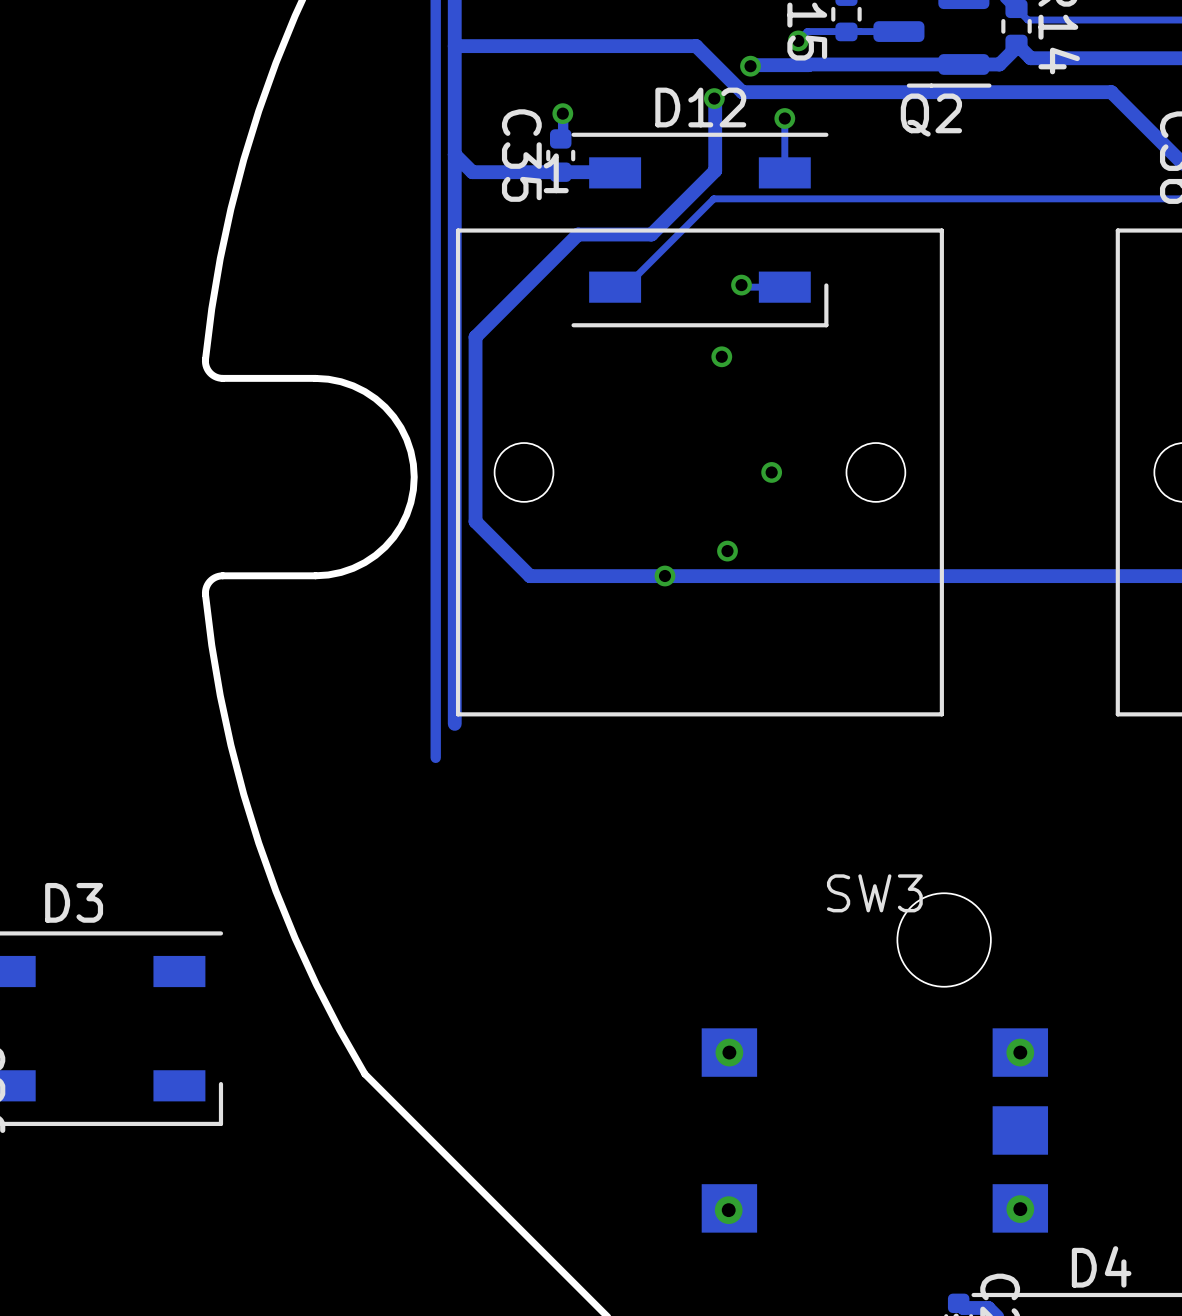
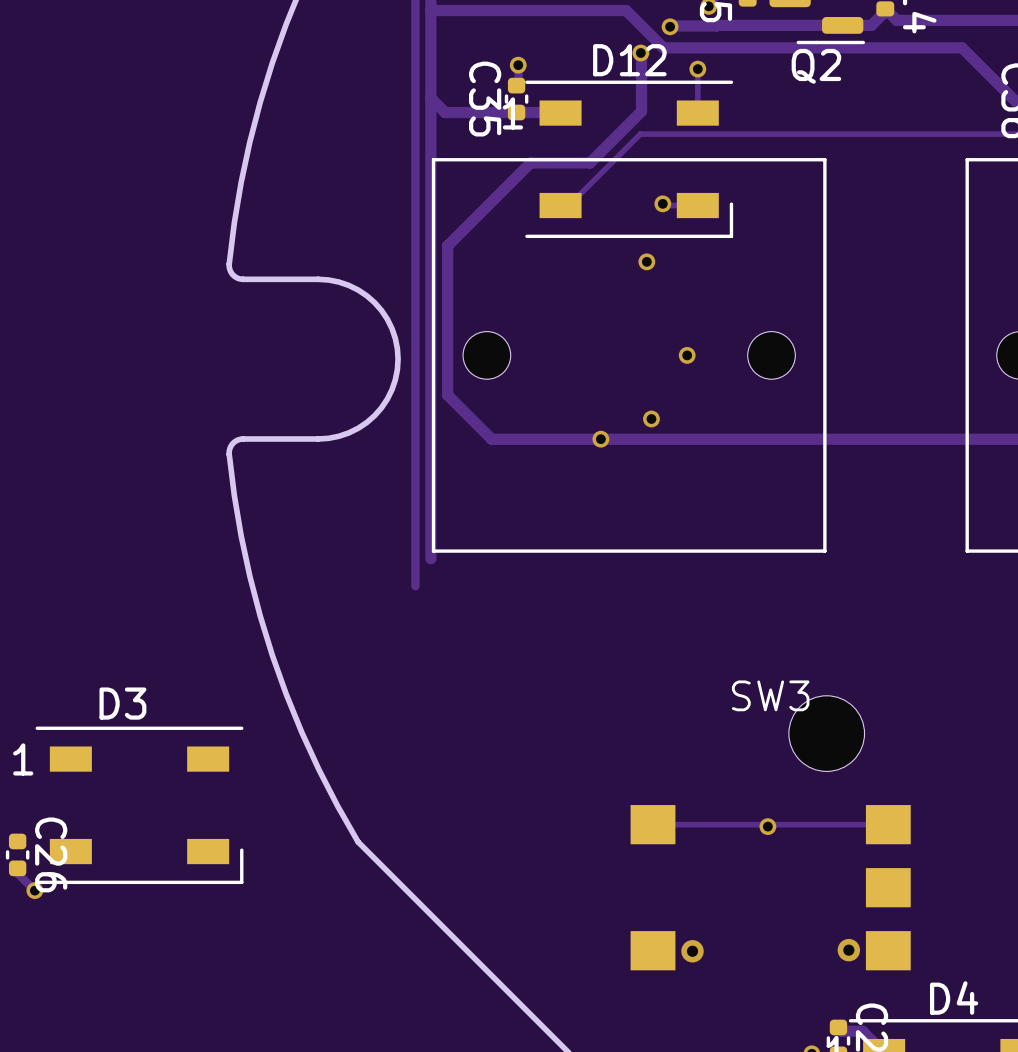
via: (729, 1052) -> none
track: none -> (888, 824) (769, 824) (767, 826) (765, 824) (653, 824)
via: (1020, 1052) -> none
via: none -> (767, 826)
via position: (1020, 1209) -> (848, 950)
via position: (728, 1210) -> (692, 951)

